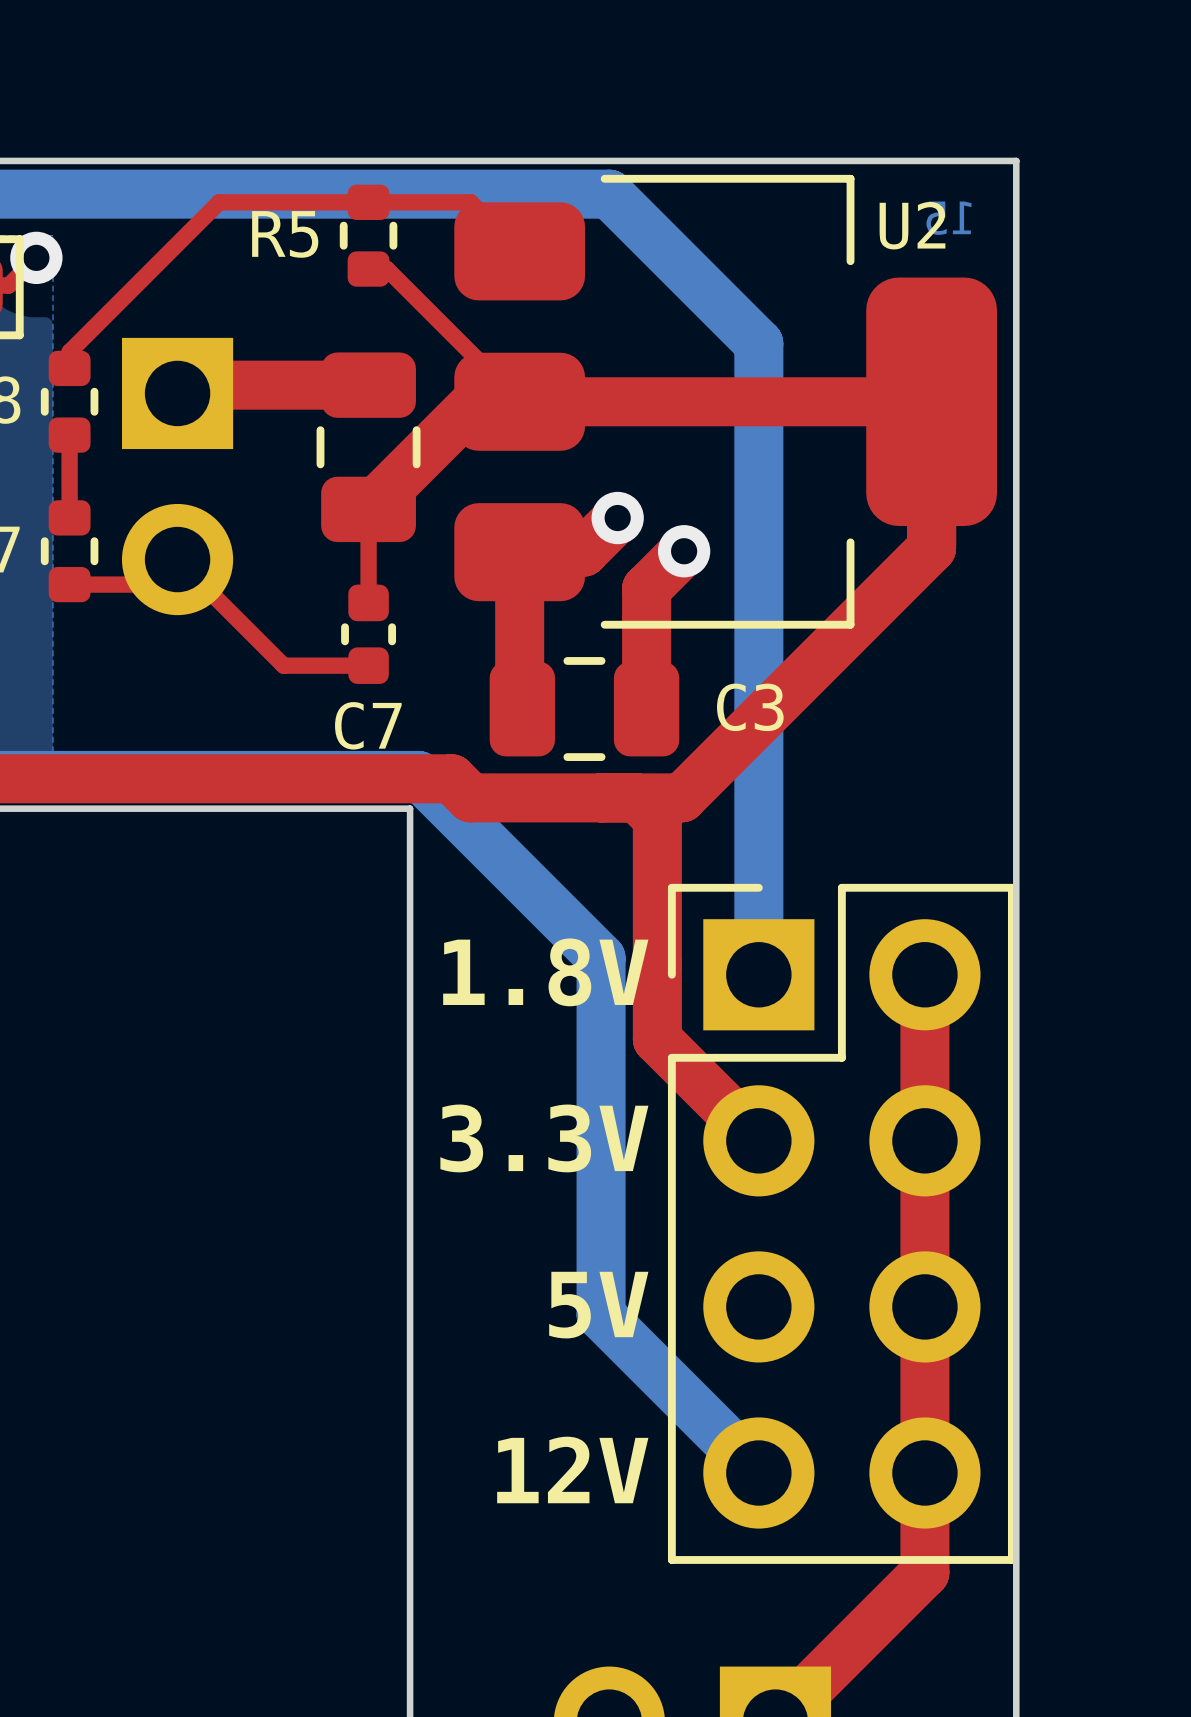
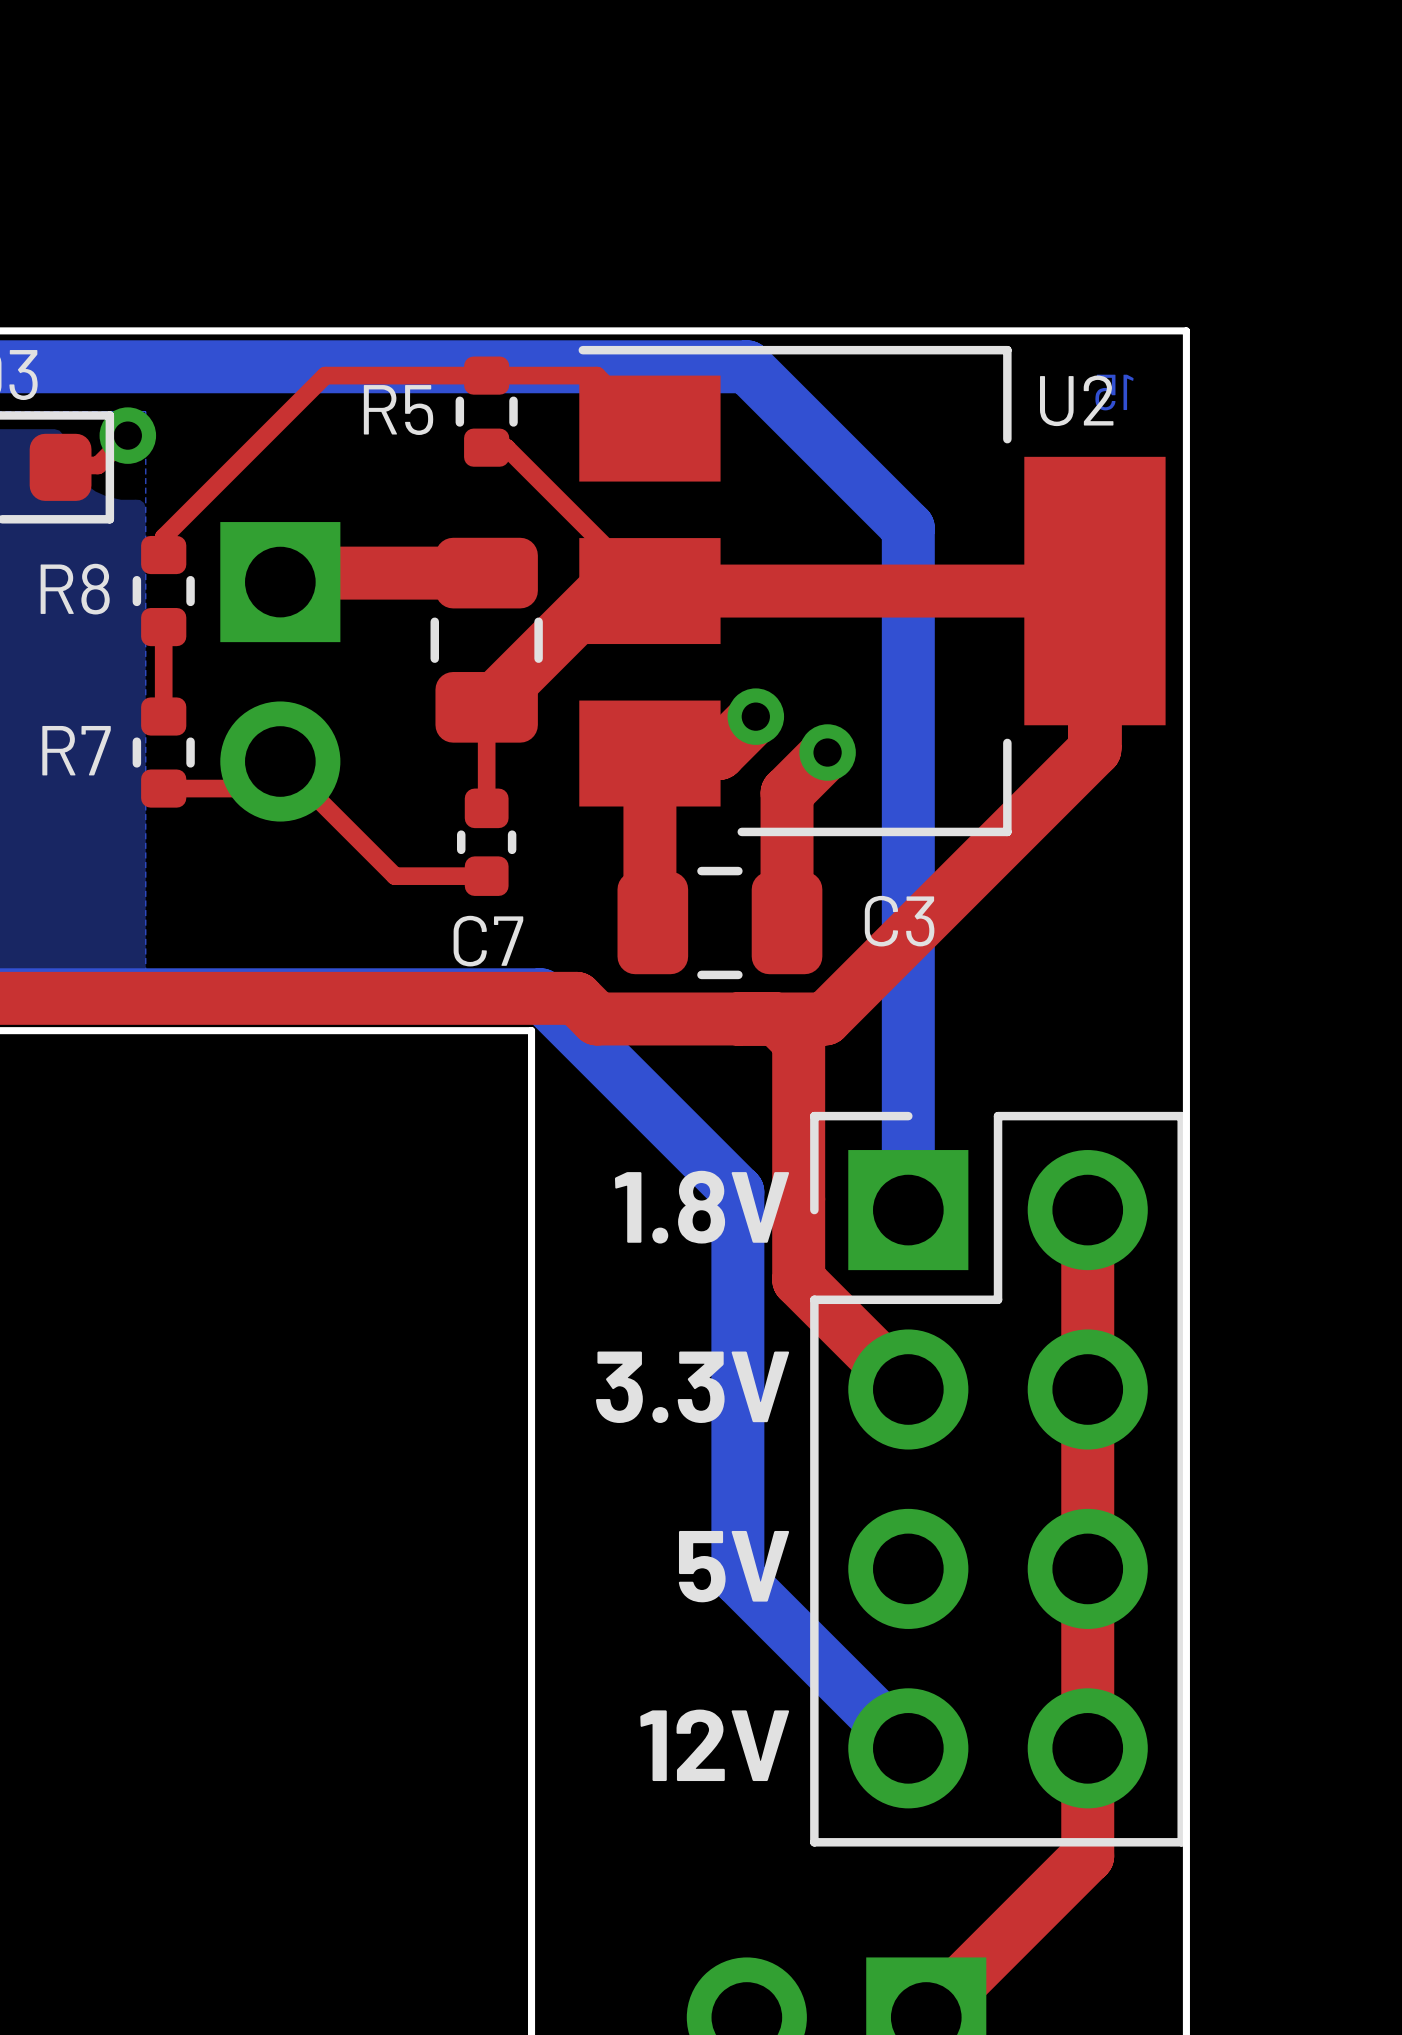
U2 footprint: [454, 174, 997, 629] -> [578, 345, 1166, 837]

